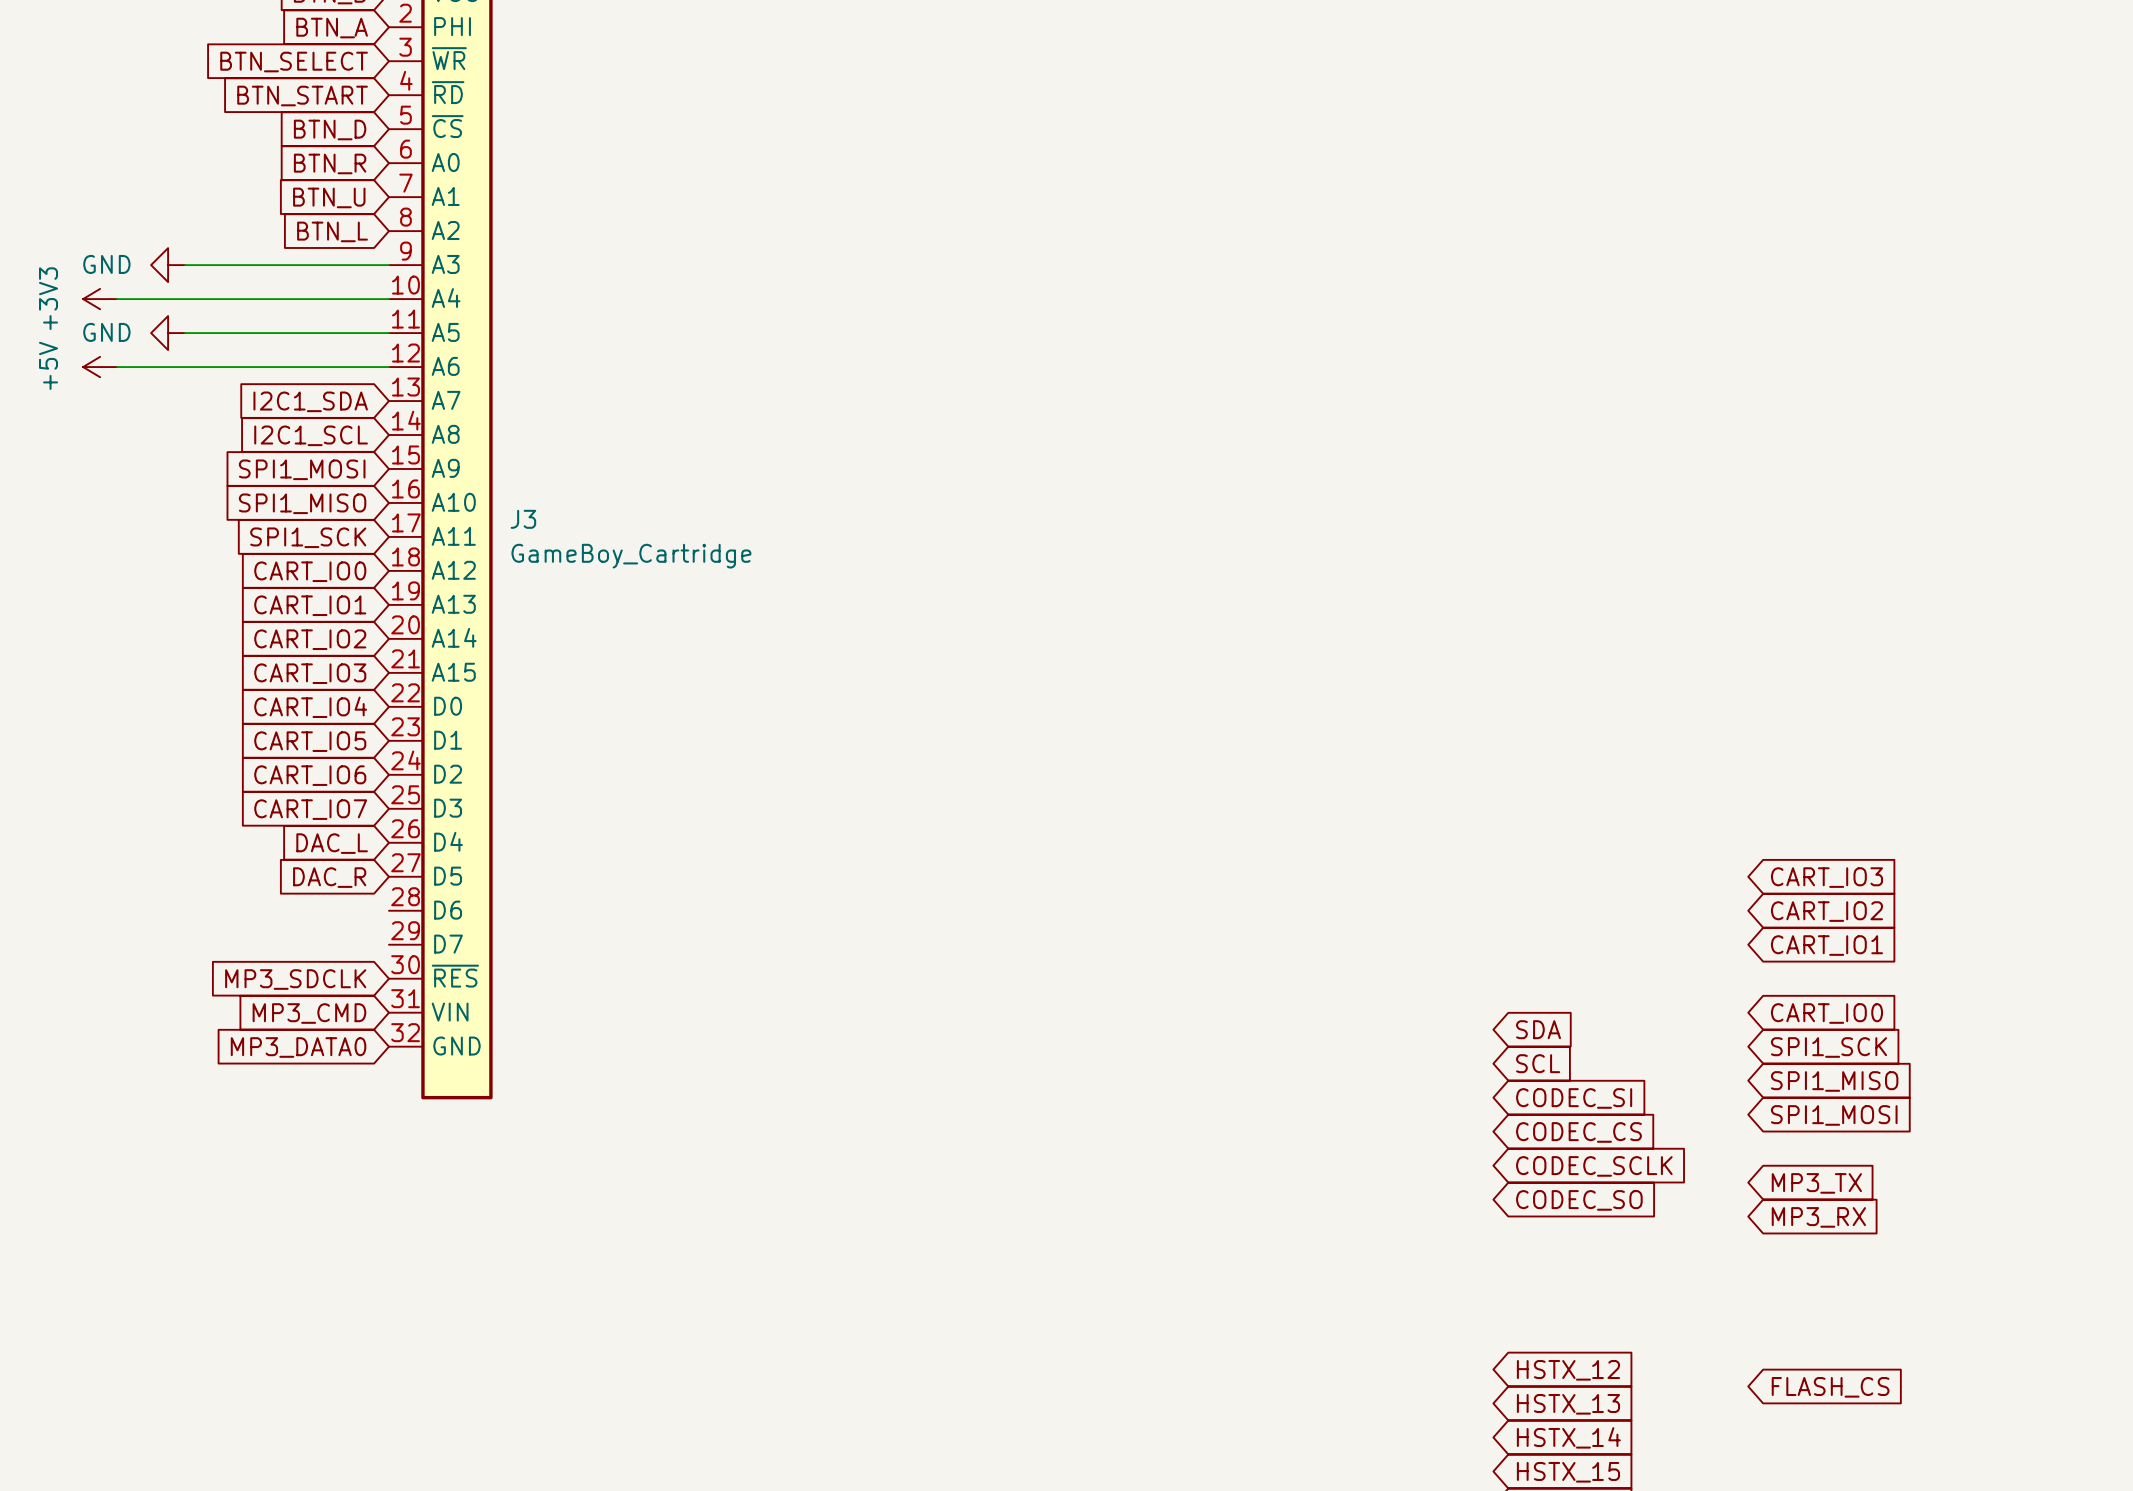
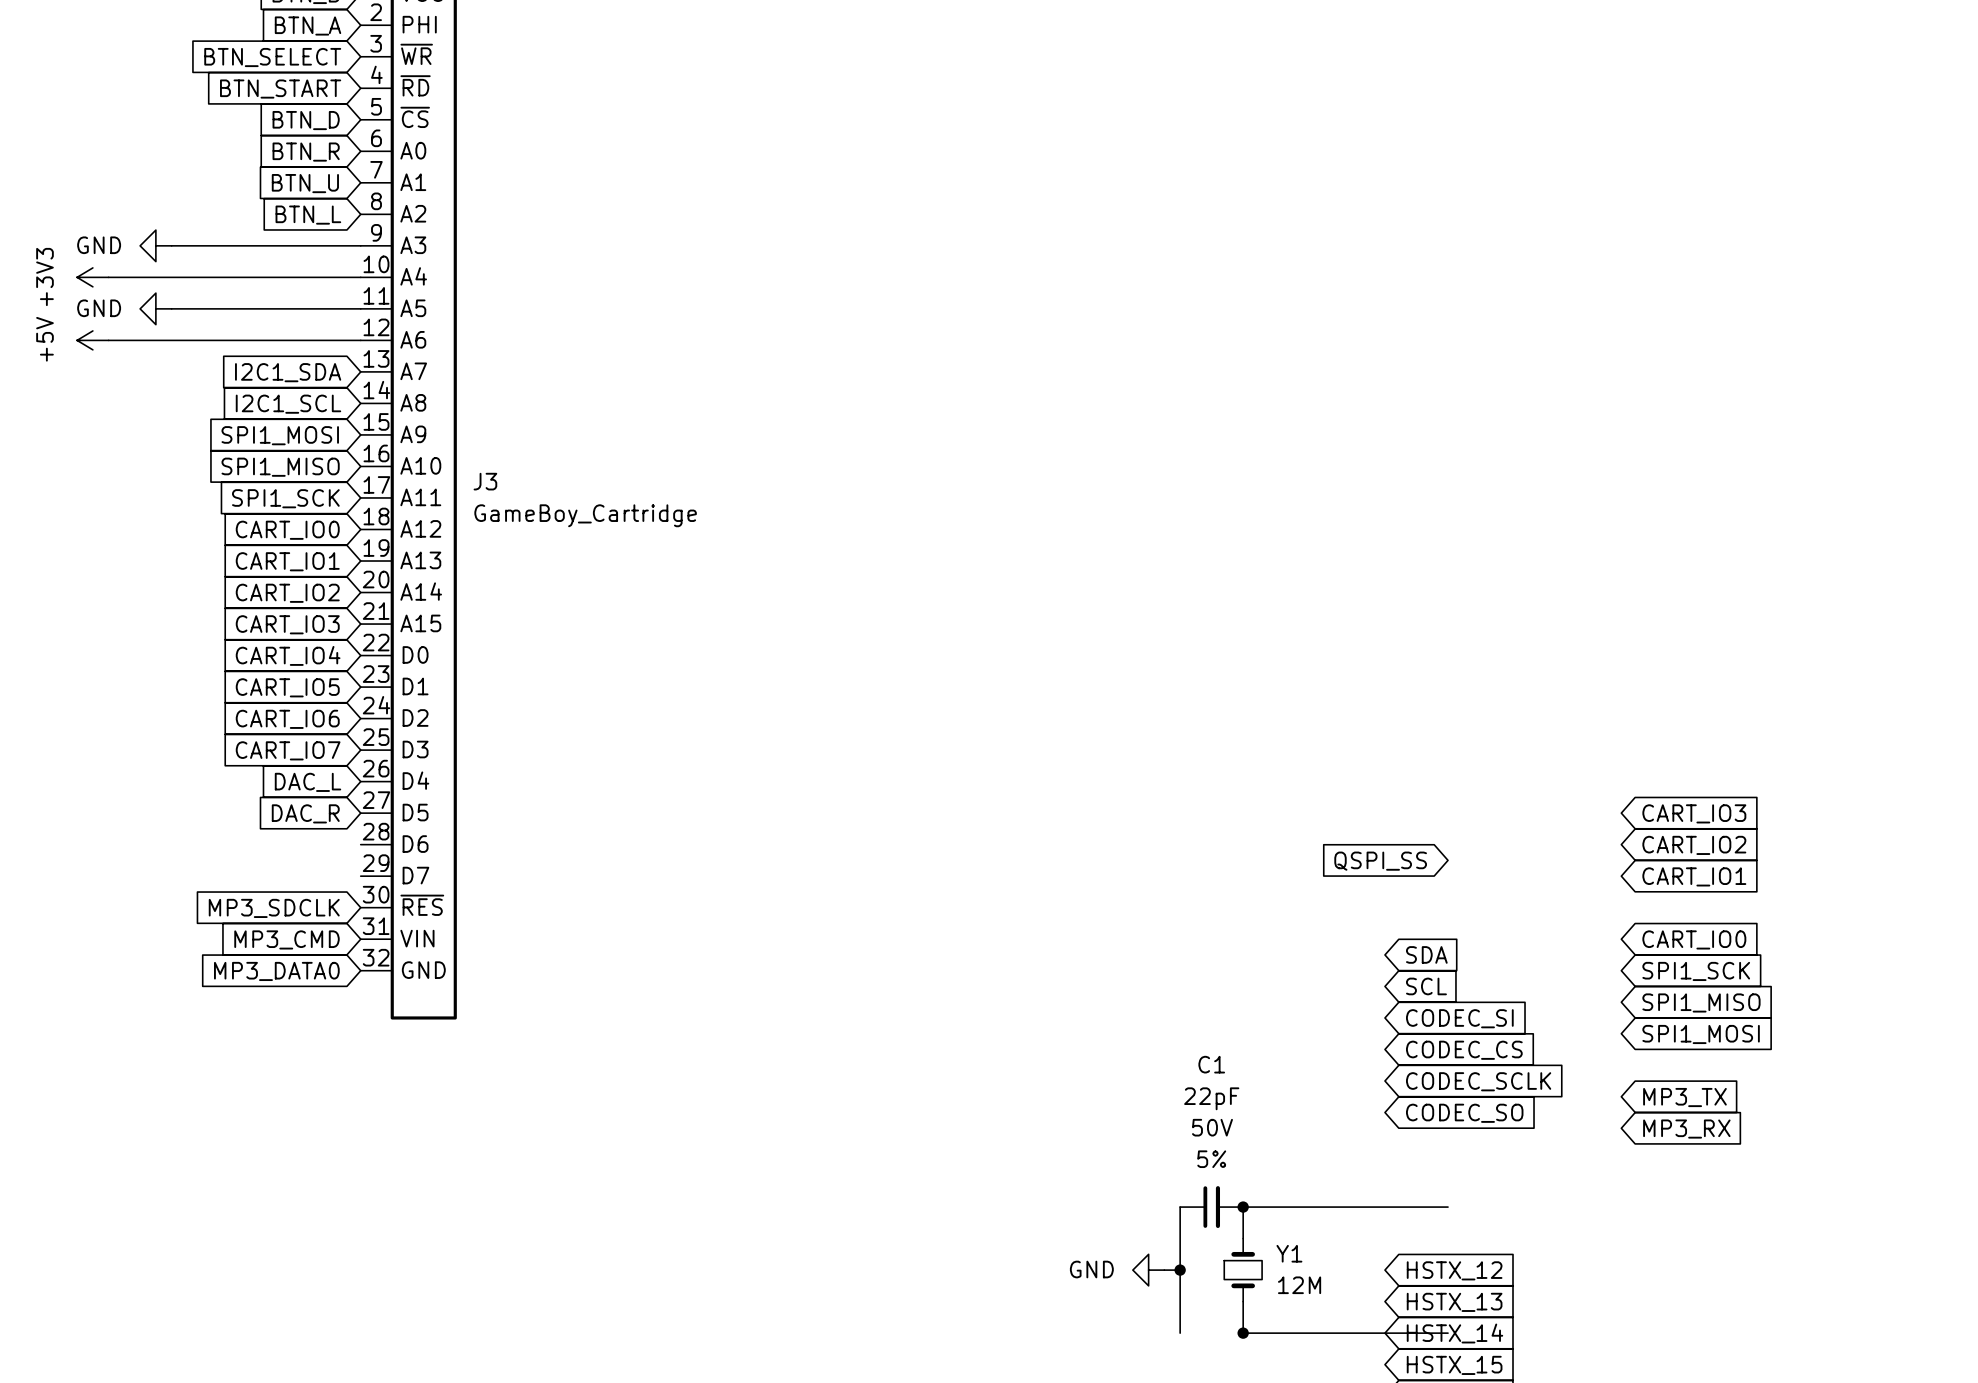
global label: none -> QSPI_SS (1380, 861)
wire: none -> (1180, 1207) (1180, 1333)
C1: none -> 22pF (1211, 1207)
junction: none -> (1243, 1207)
wire: none -> (1448, 1207) (1243, 1207) (1243, 1238)
power symbol: none -> GND (1148, 1270)
wire: none -> (1164, 1270) (1180, 1270)
junction: none -> (1180, 1270)
Y1: none -> 12M (1243, 1270)
global label: FLASH_CS (1830, 1387) -> none
wire: none -> (1243, 1301) (1243, 1333) (1448, 1333)
junction: none -> (1243, 1333)

